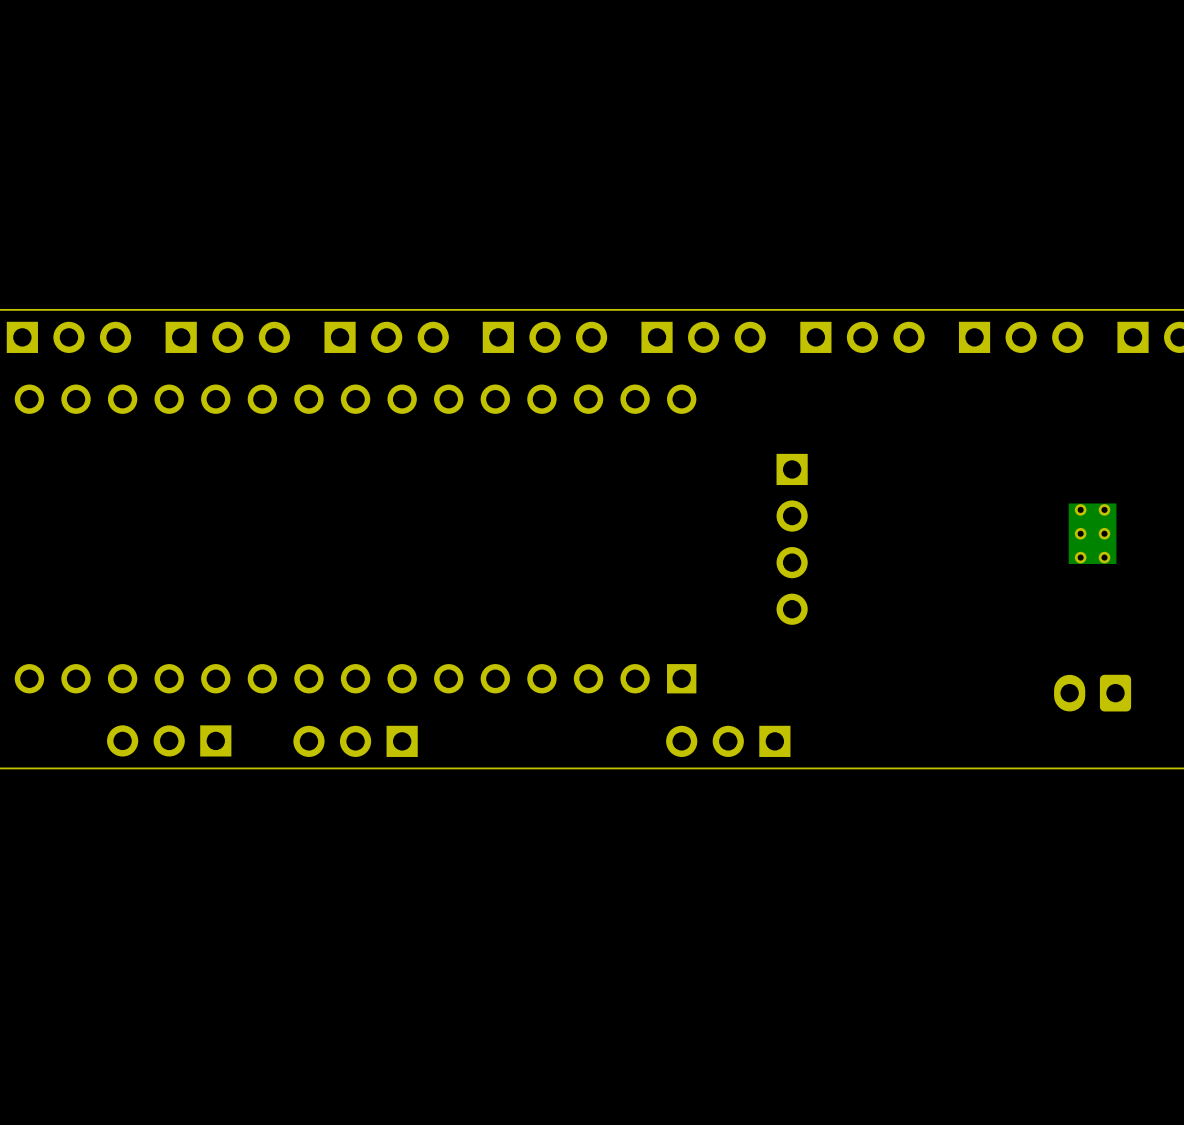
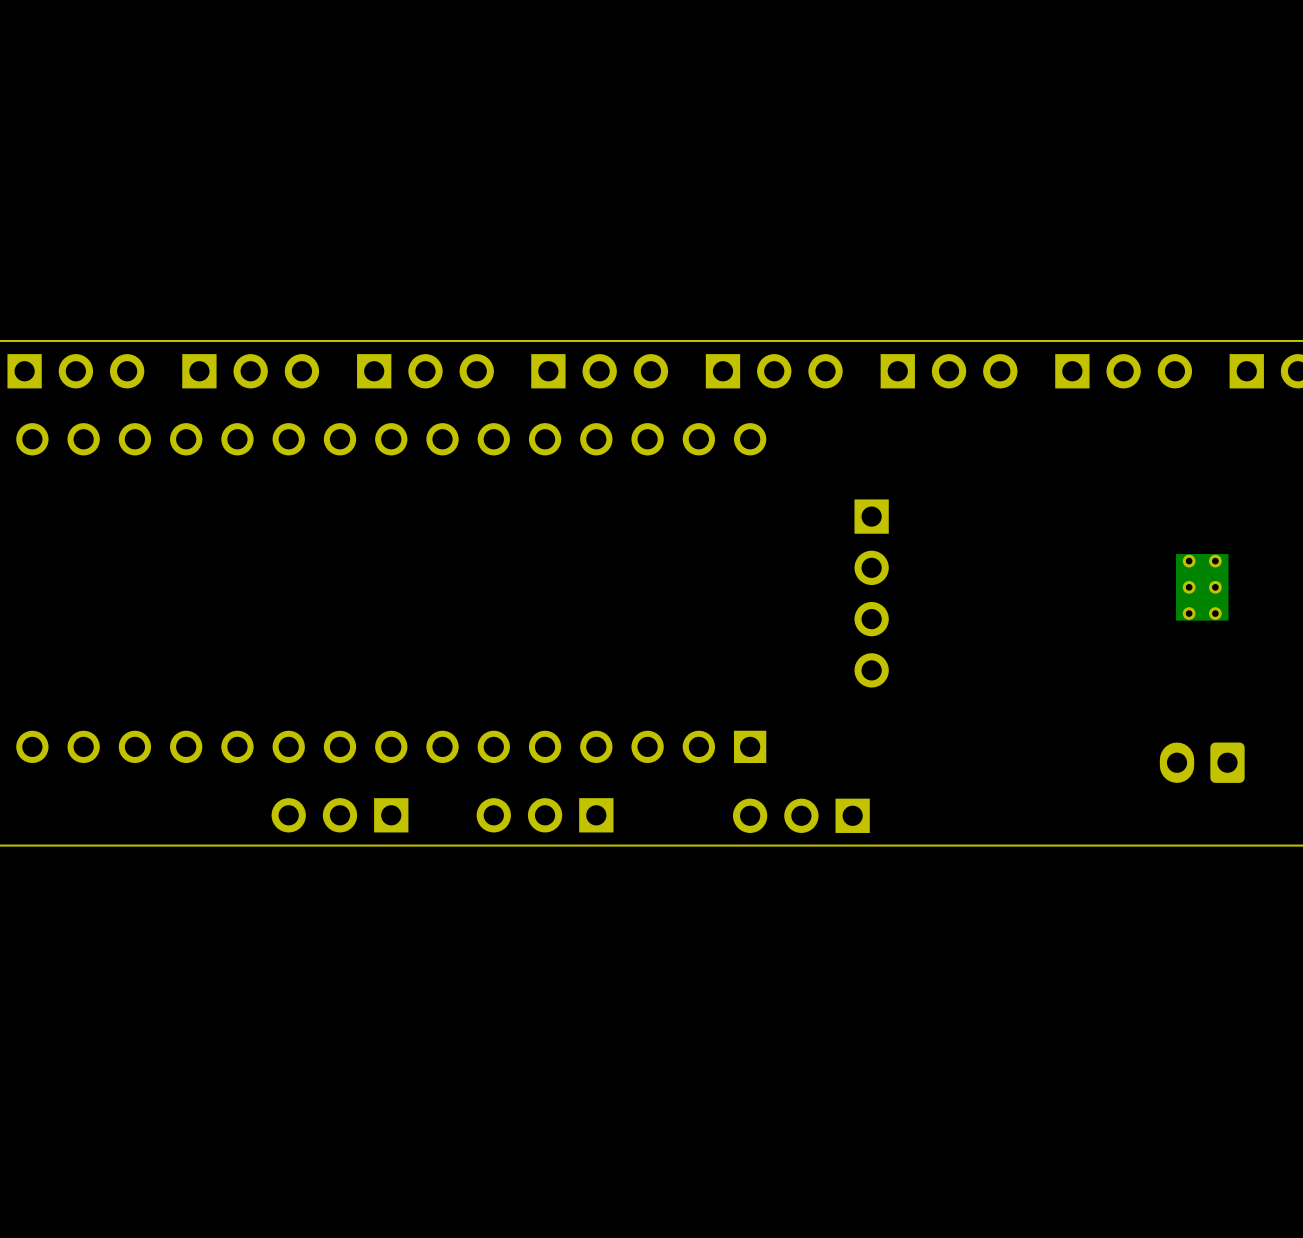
part: (169, 740) -> none
part: none -> (545, 815)
part position: (355, 741) -> (339, 815)

